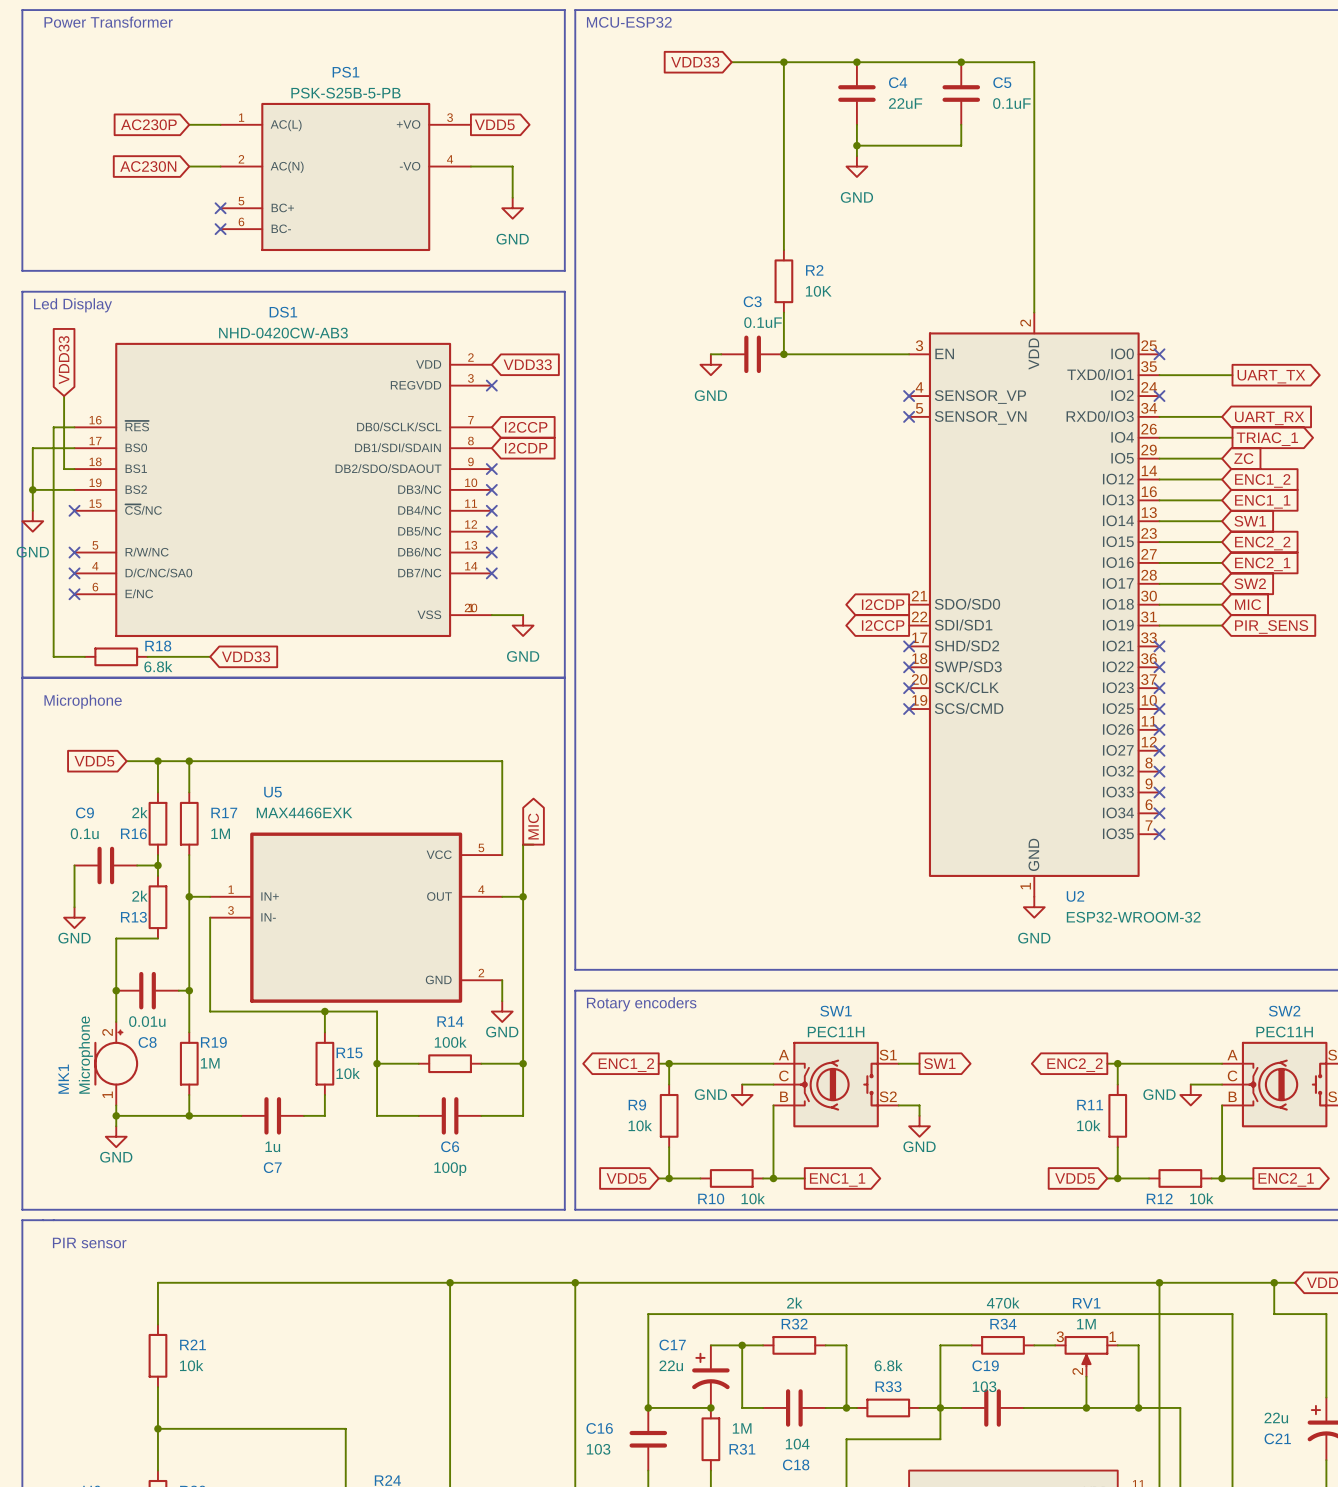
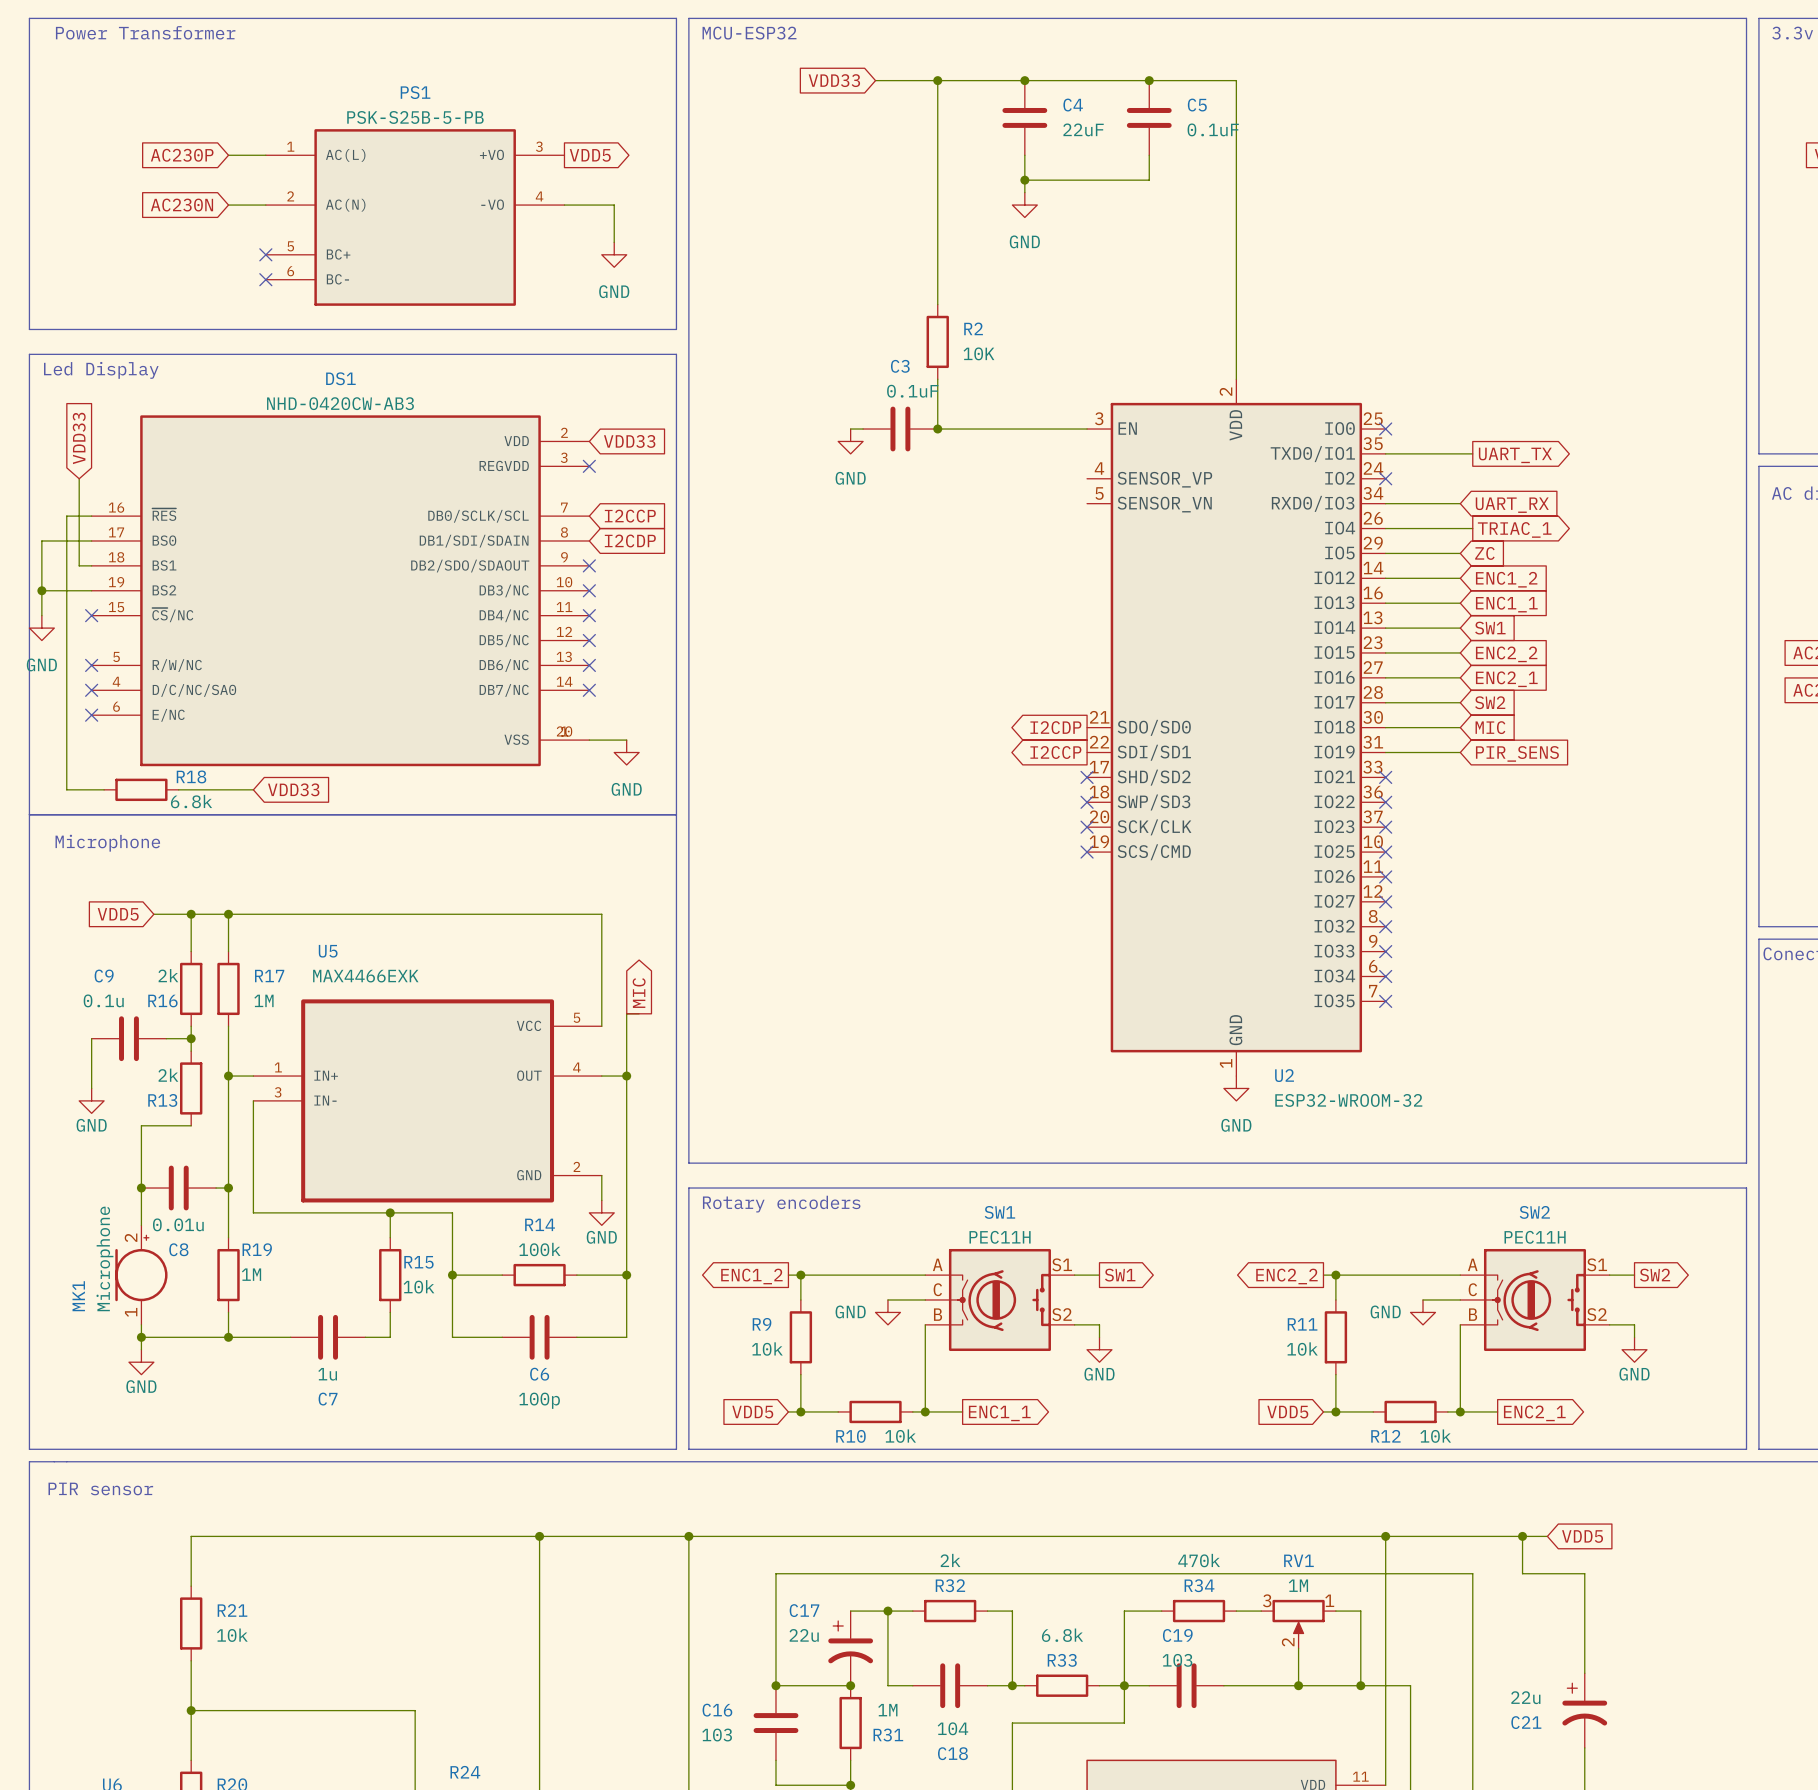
no-connect mark: (909, 396) -> none
no-connect mark: (909, 416) -> none

